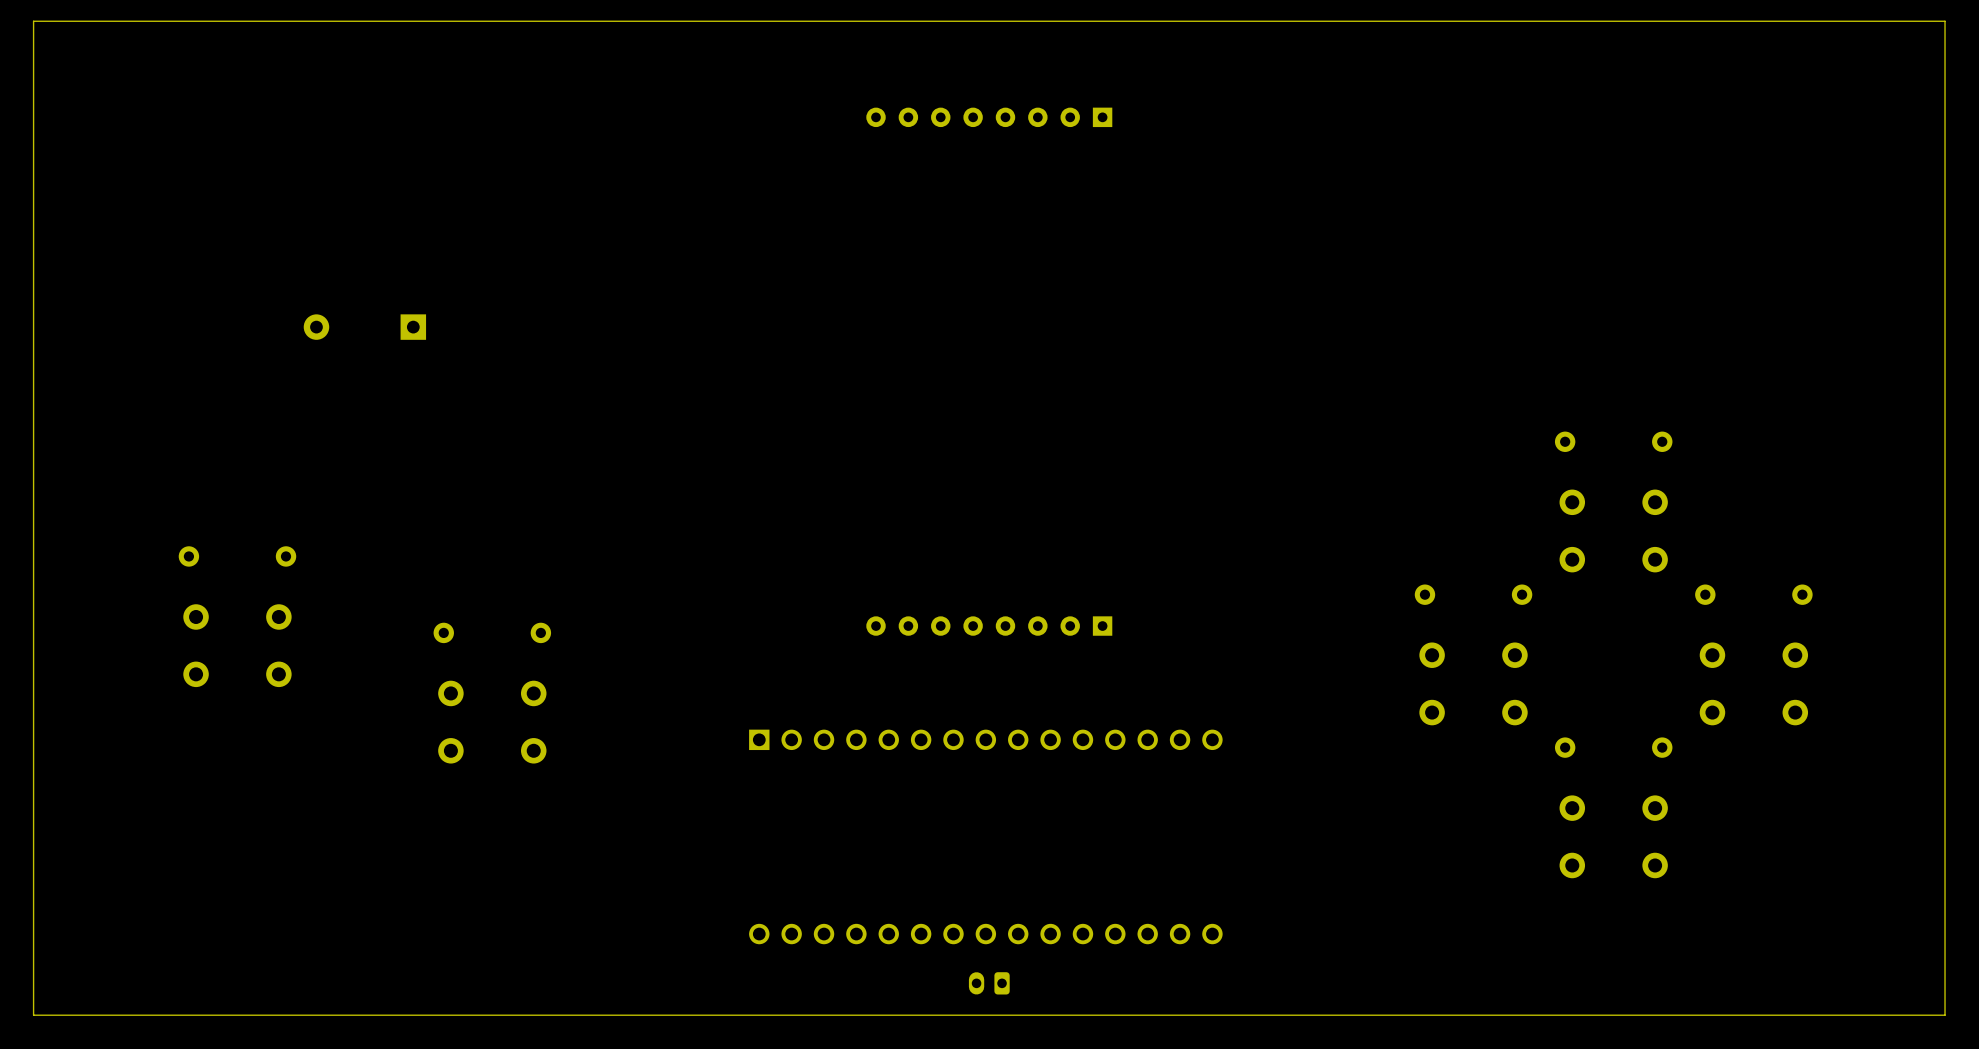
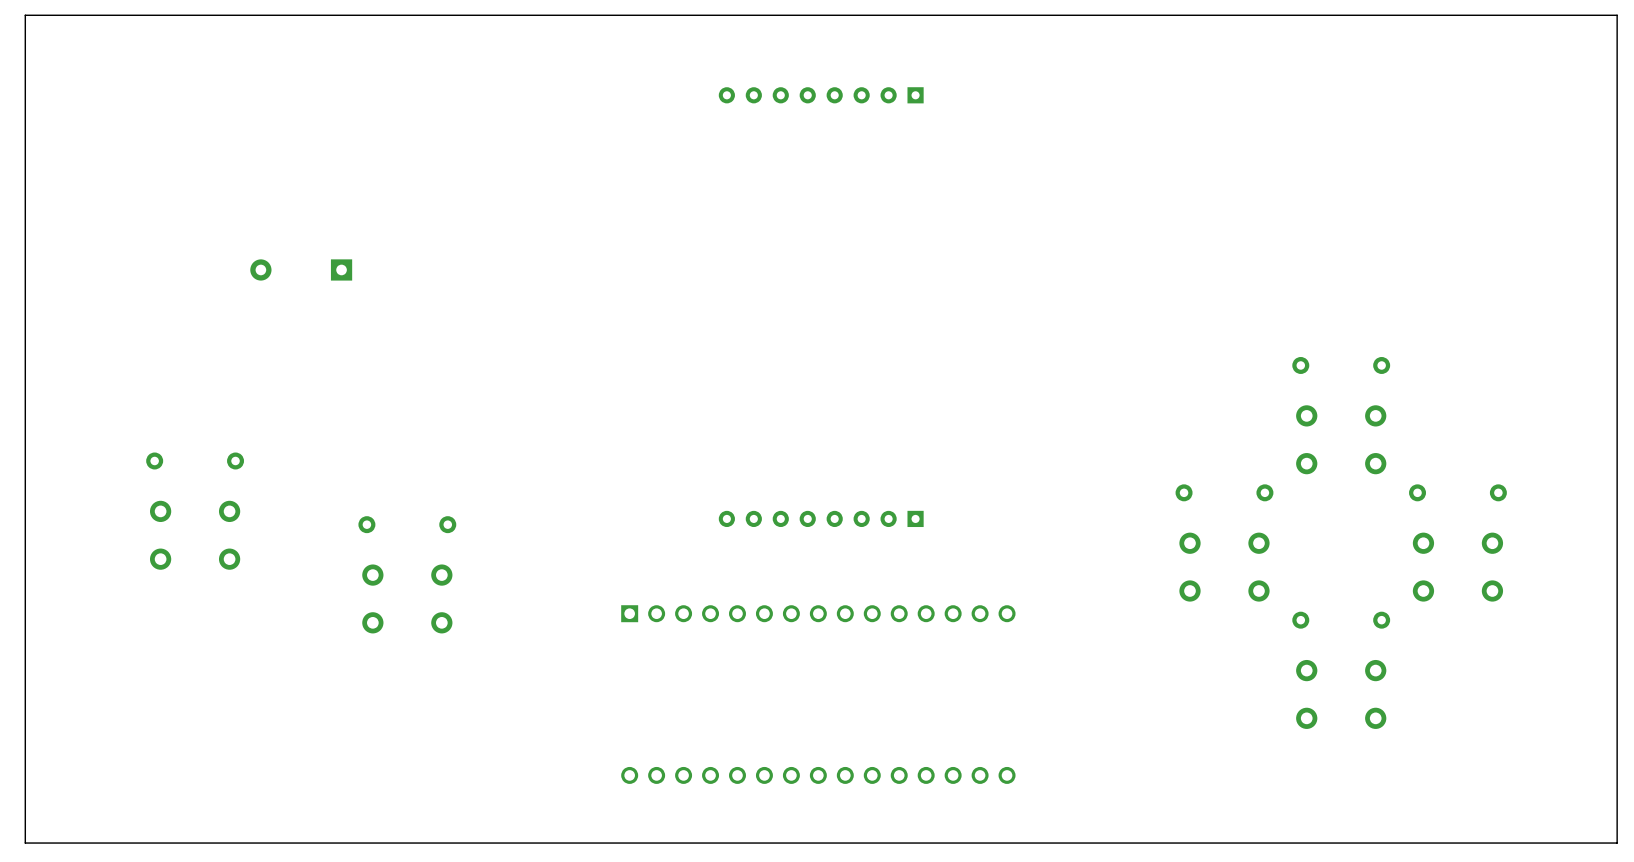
part: (989, 983) -> none

